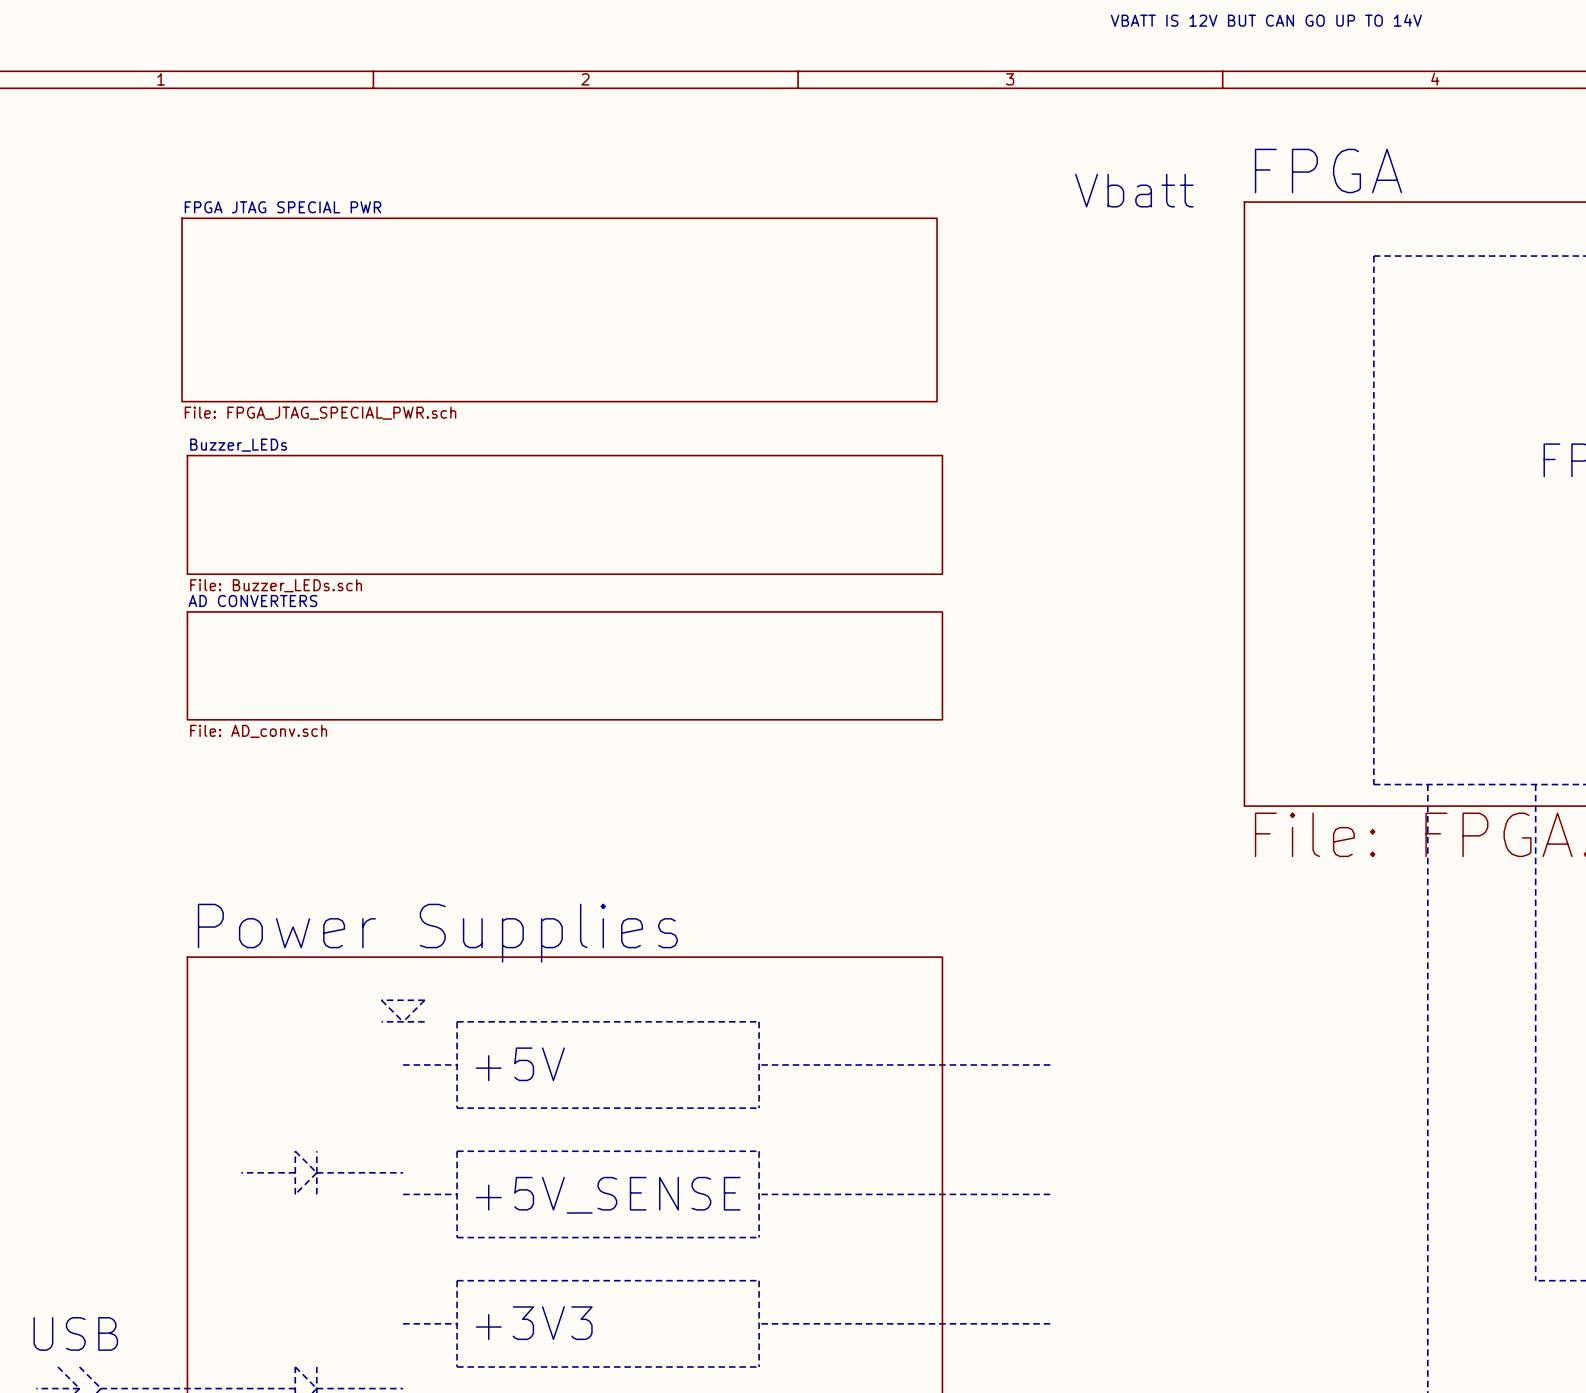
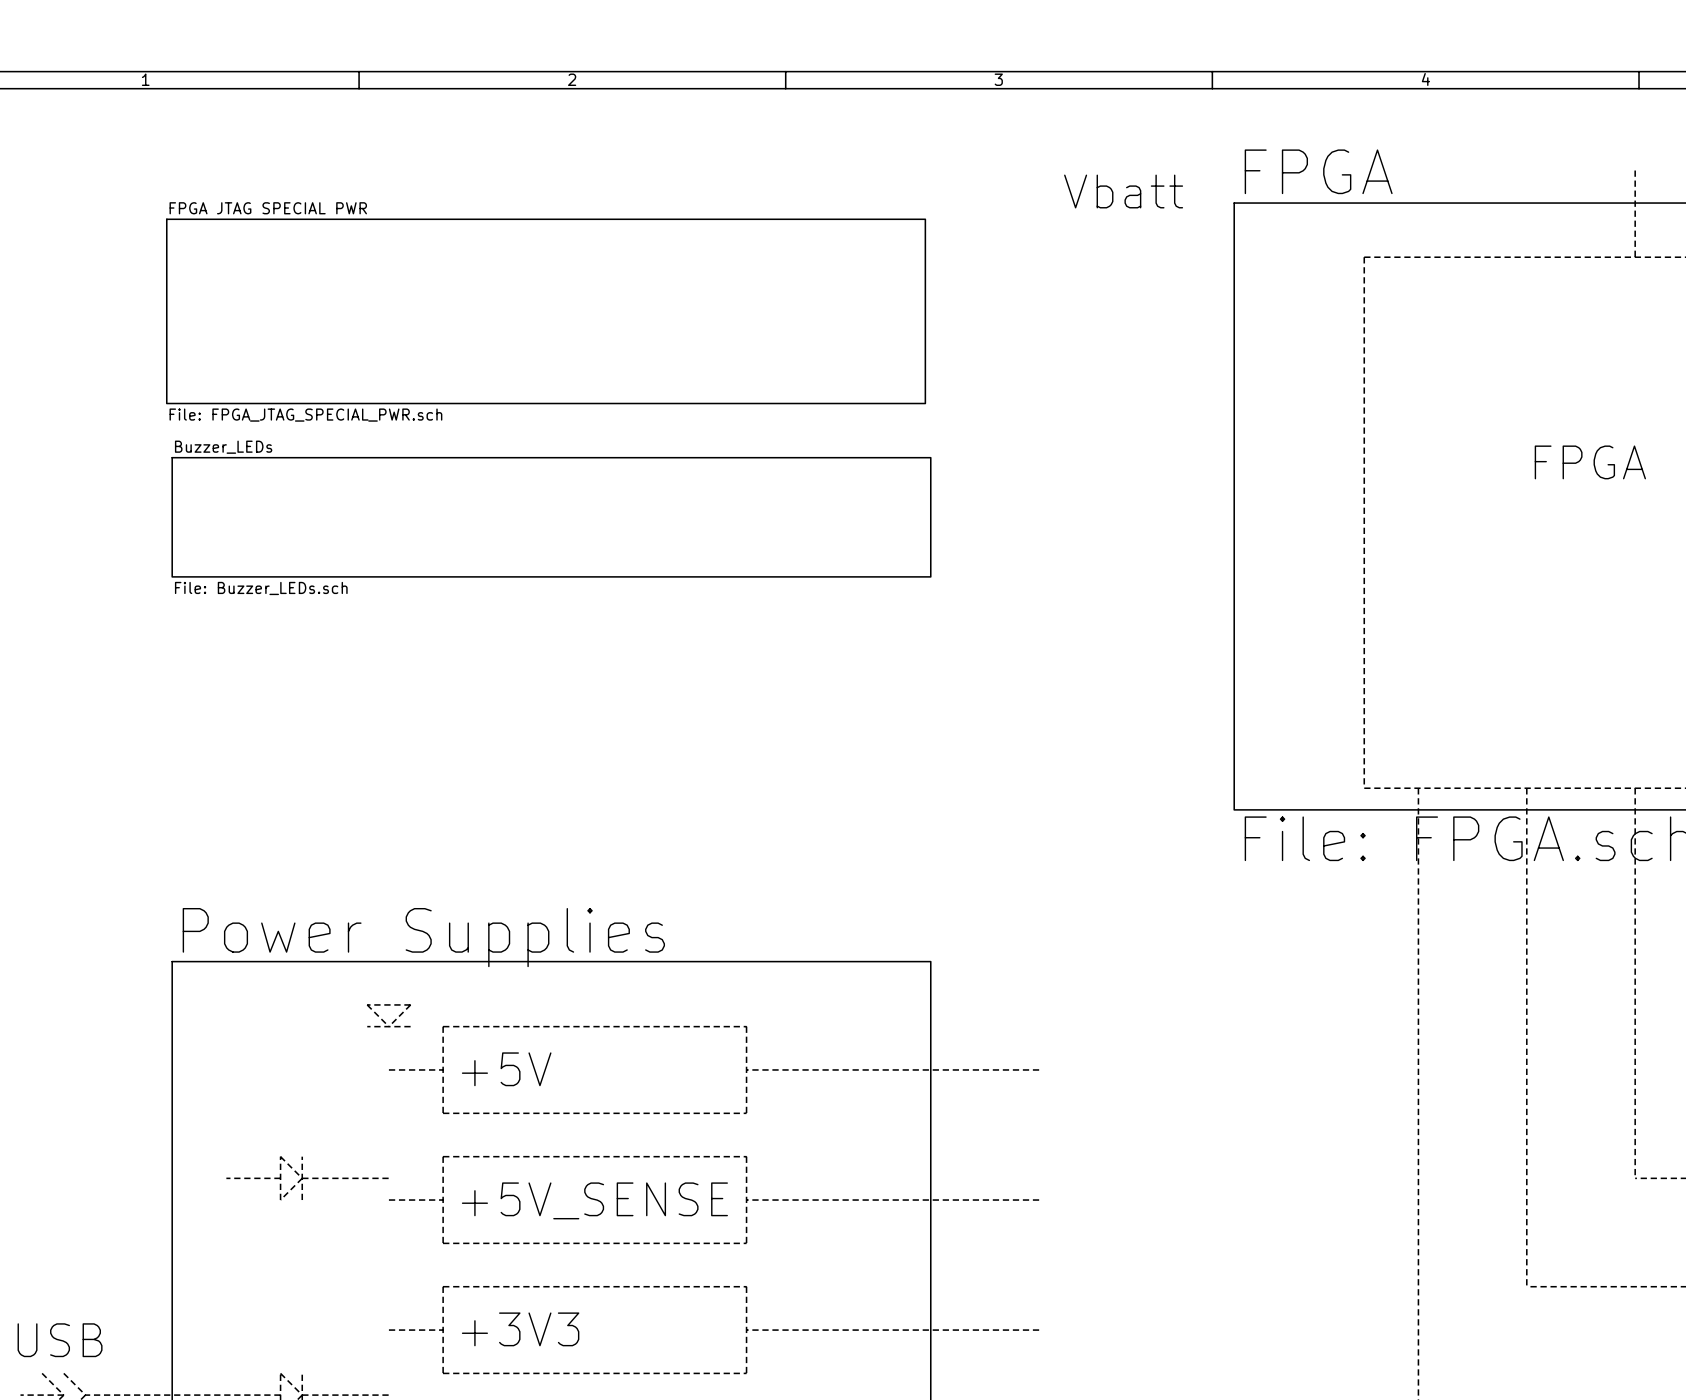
text: VBATT IS 12V BUT CAN GO UP TO 14V (1266, 20) -> none
sheet AD CONVERTERS: File: AD_conv.sch (564, 665) -> none

